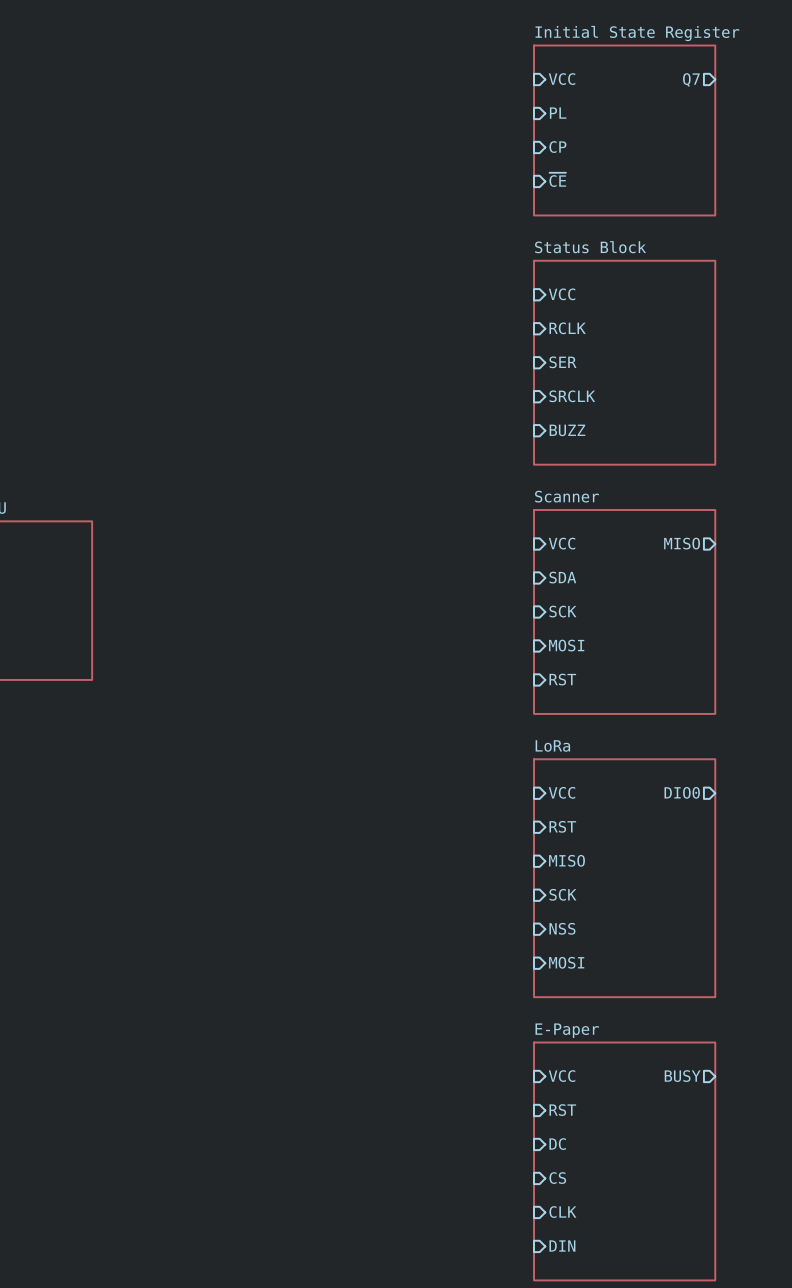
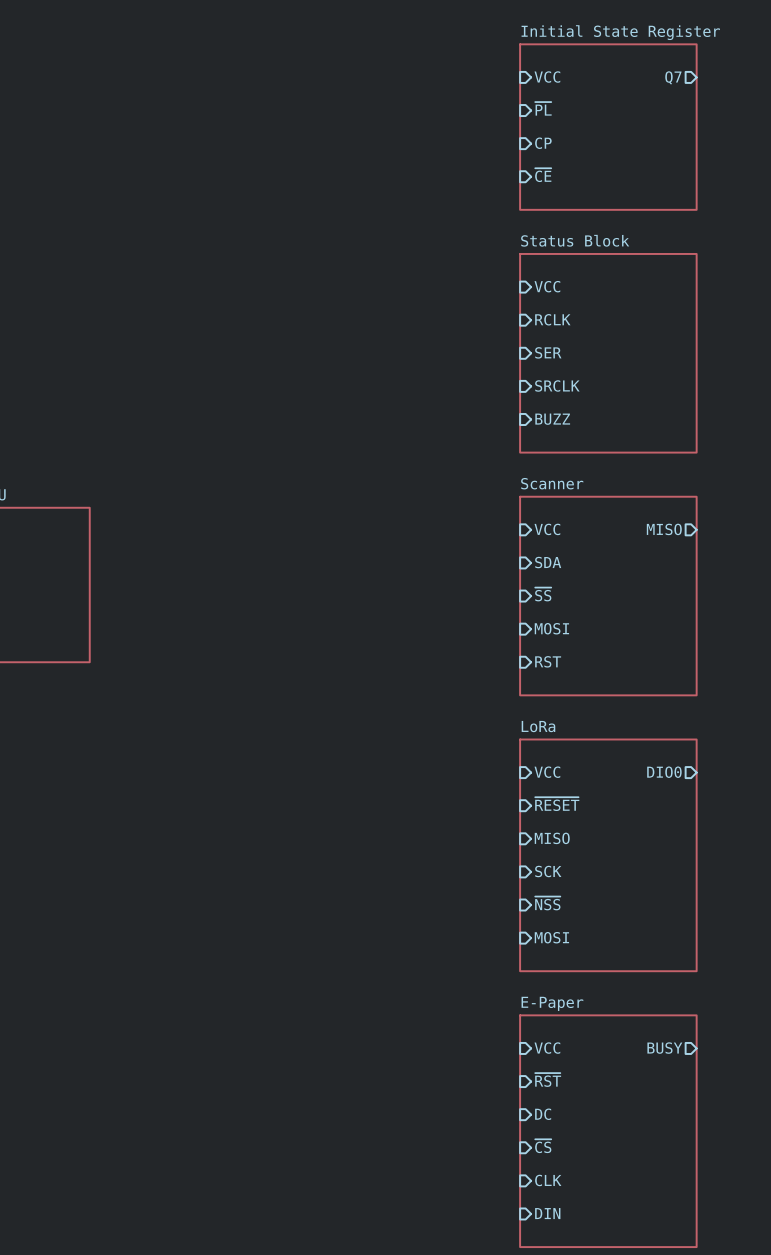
sheet pin: PL (558, 113) -> ~{PL} (543, 108)
sheet pin: SCK (562, 611) -> ~{SS} (543, 594)
sheet pin: RST (562, 826) -> ~{RESET} (557, 804)
sheet pin: NSS (562, 928) -> ~{NSS} (547, 903)
sheet pin: RST (562, 1110) -> ~{RST} (548, 1079)
sheet pin: CS (557, 1178) -> ~{CS} (543, 1146)

